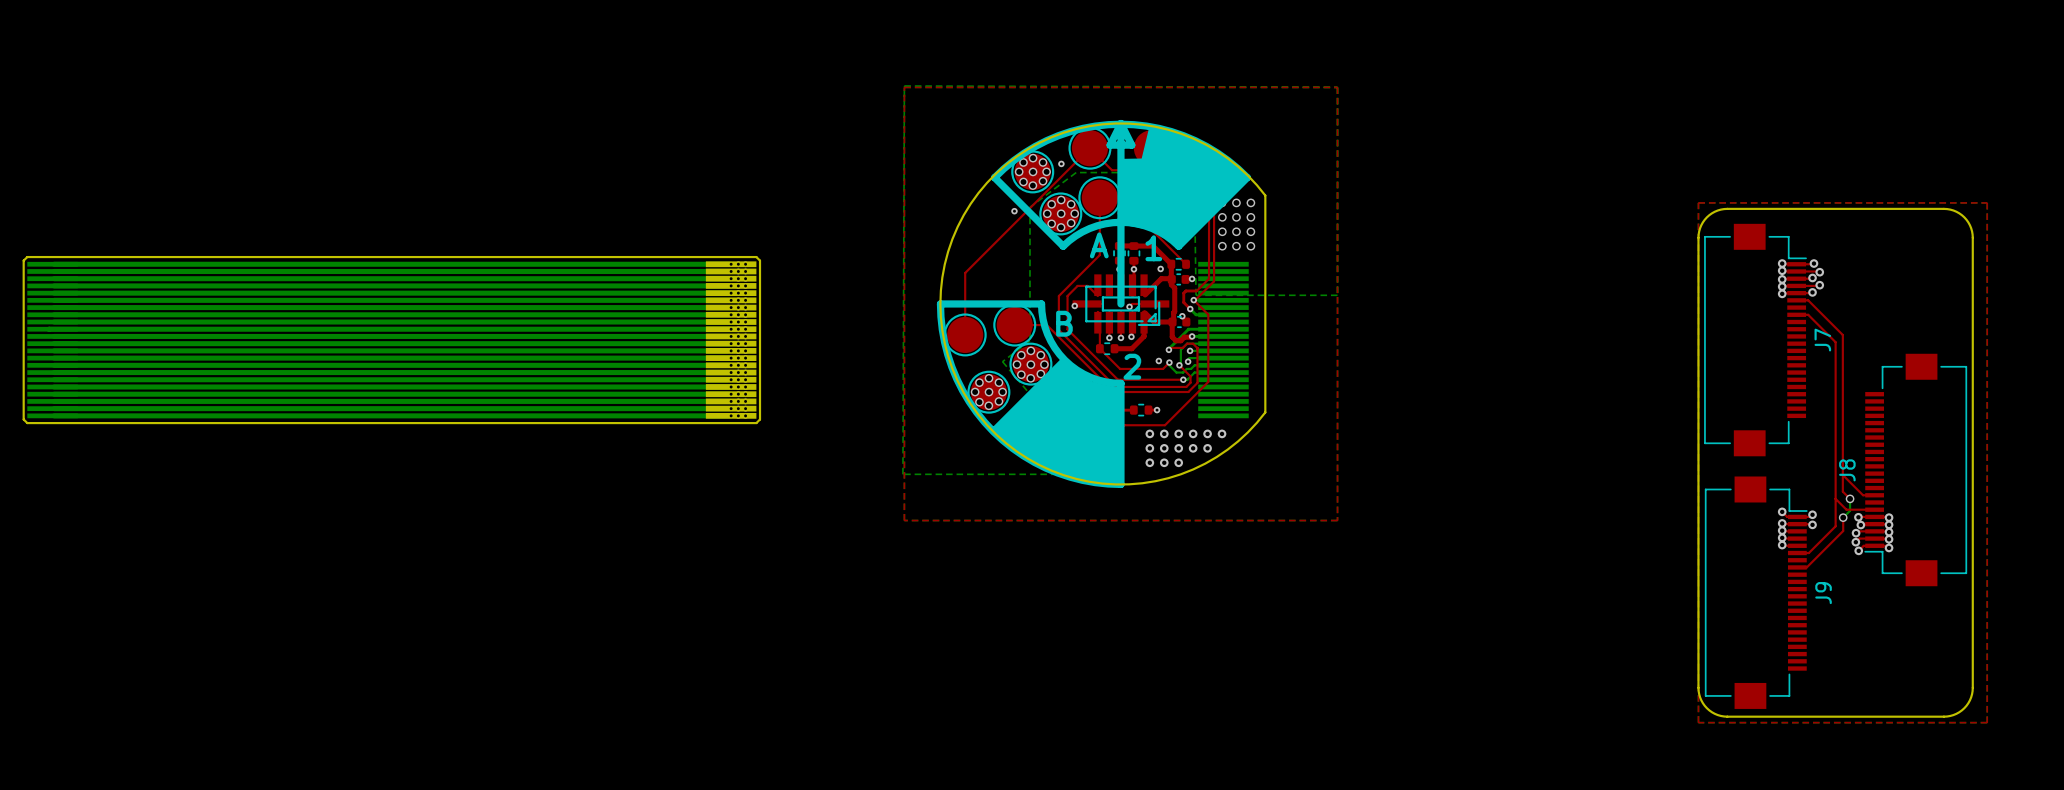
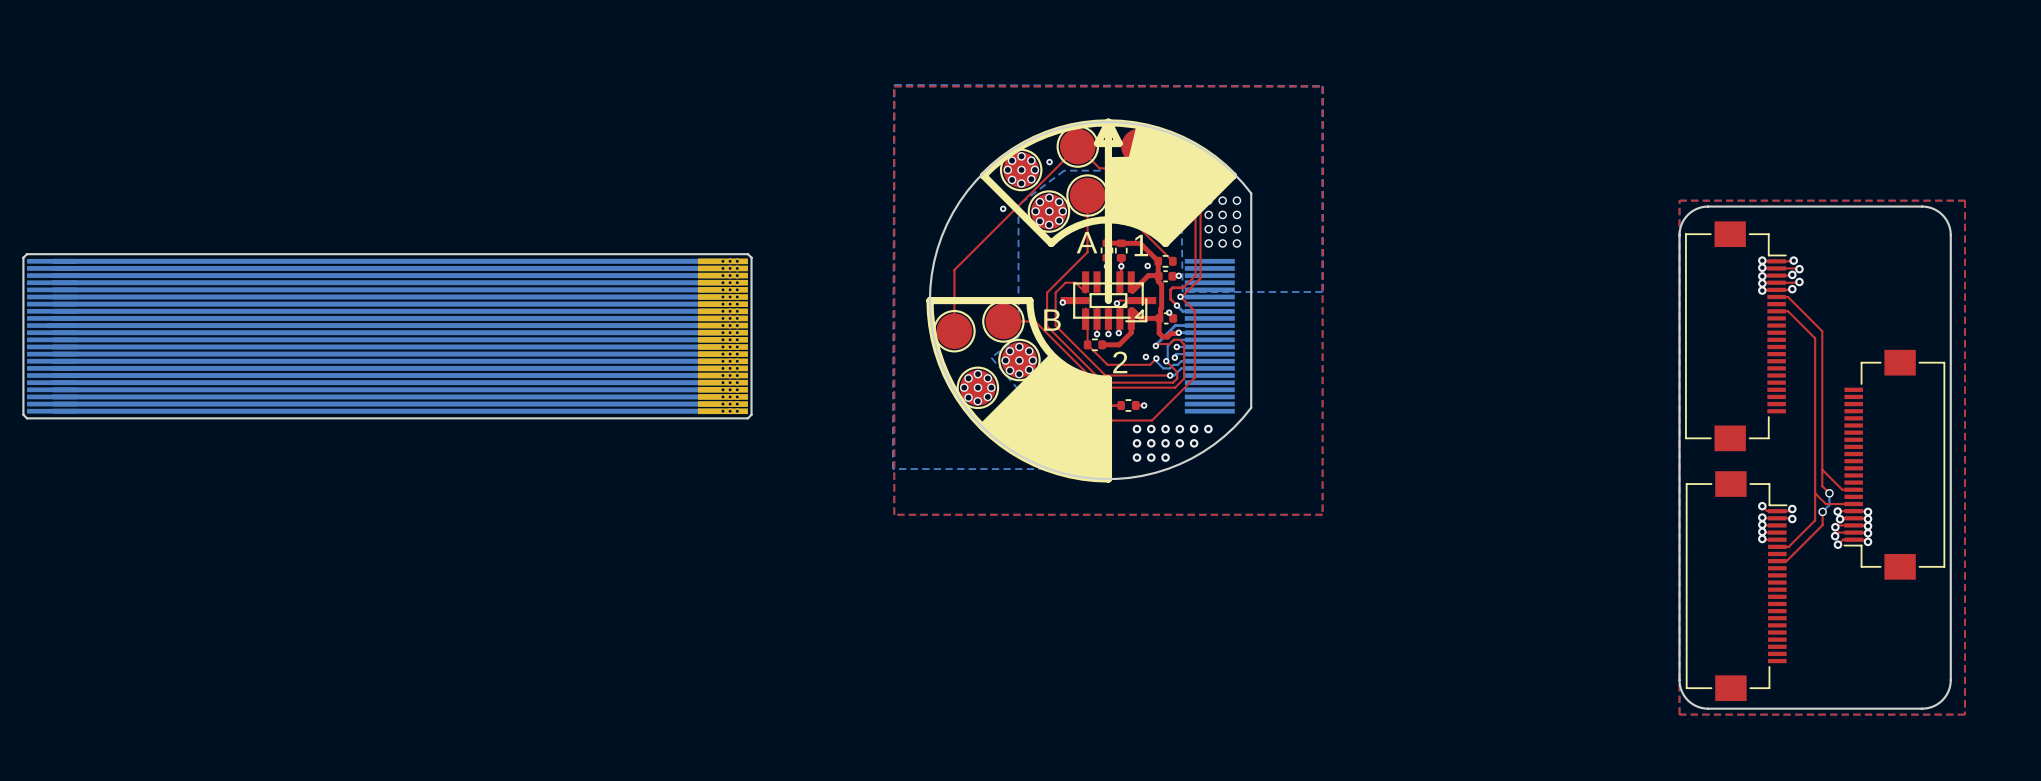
J7 name: J7 (1822, 340) -> none
J8 name: J8 (1847, 470) -> none
J9 name: J9 (1823, 593) -> none

